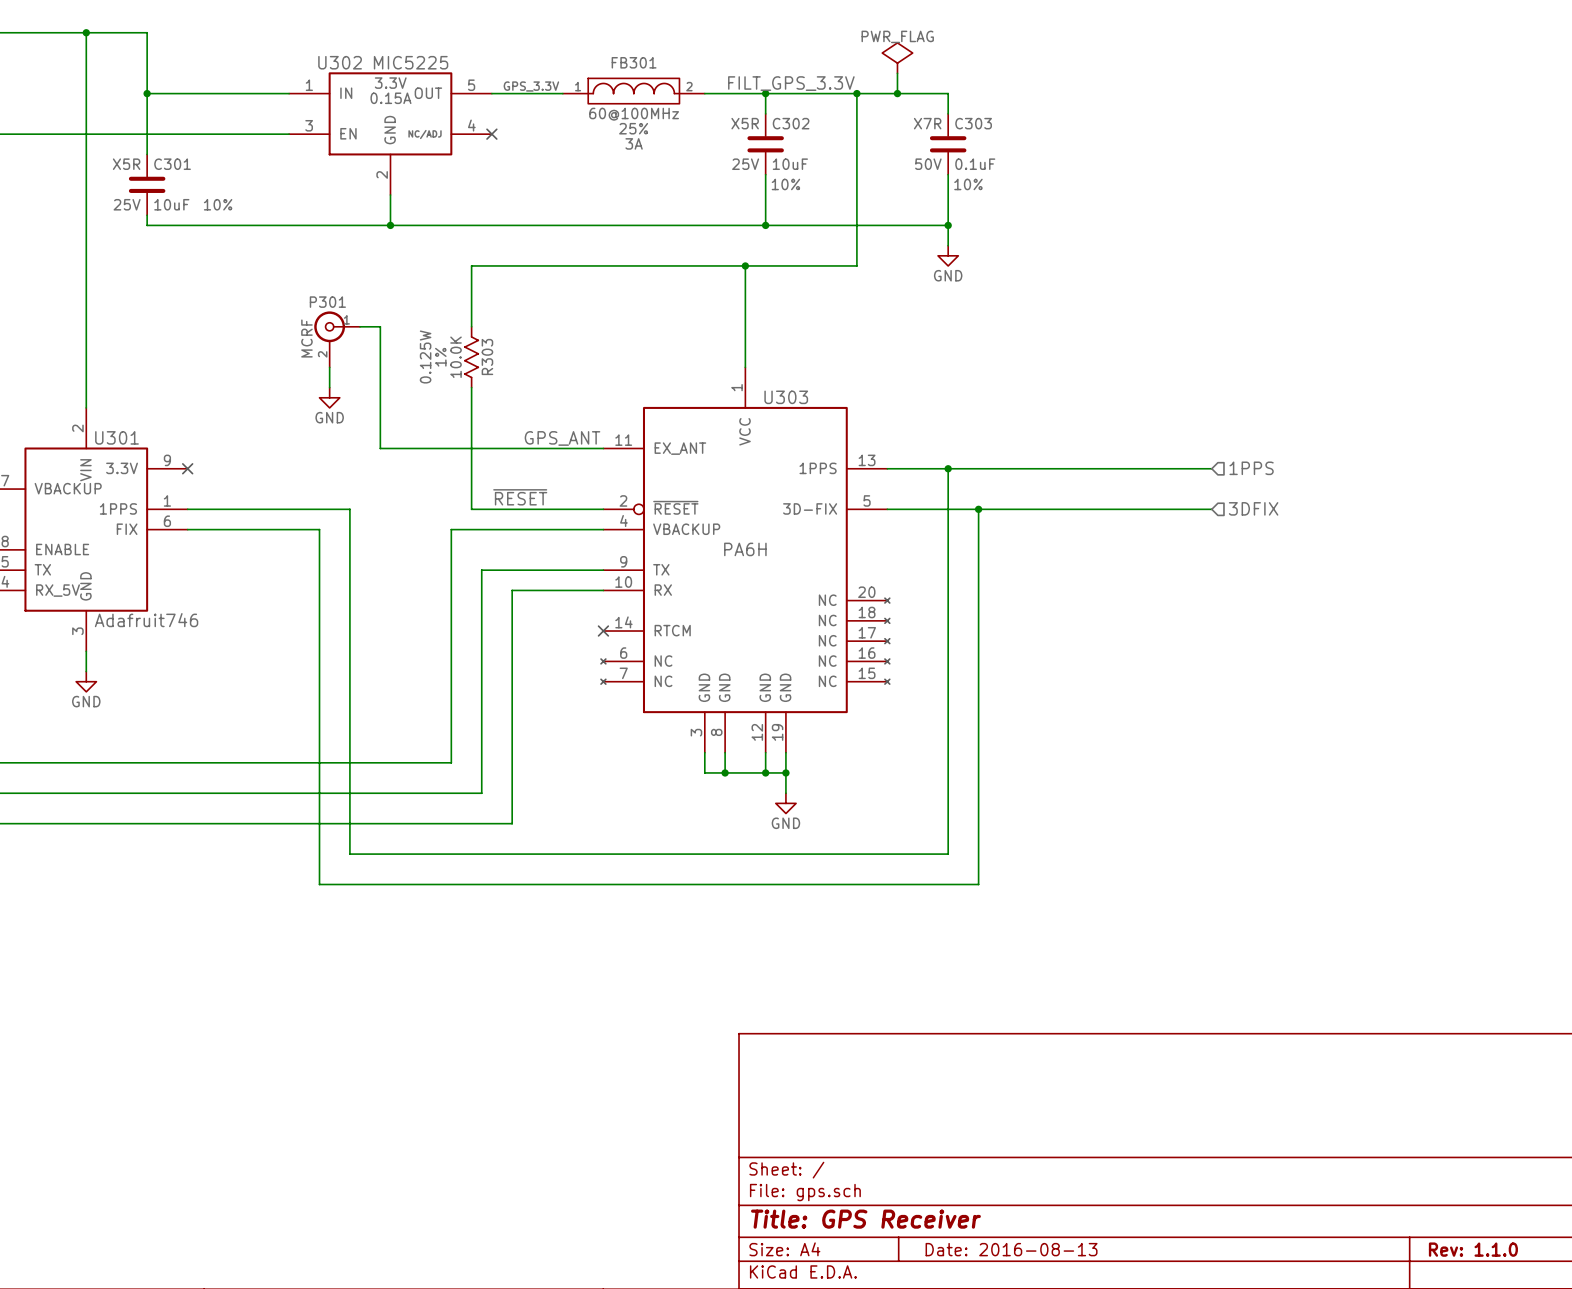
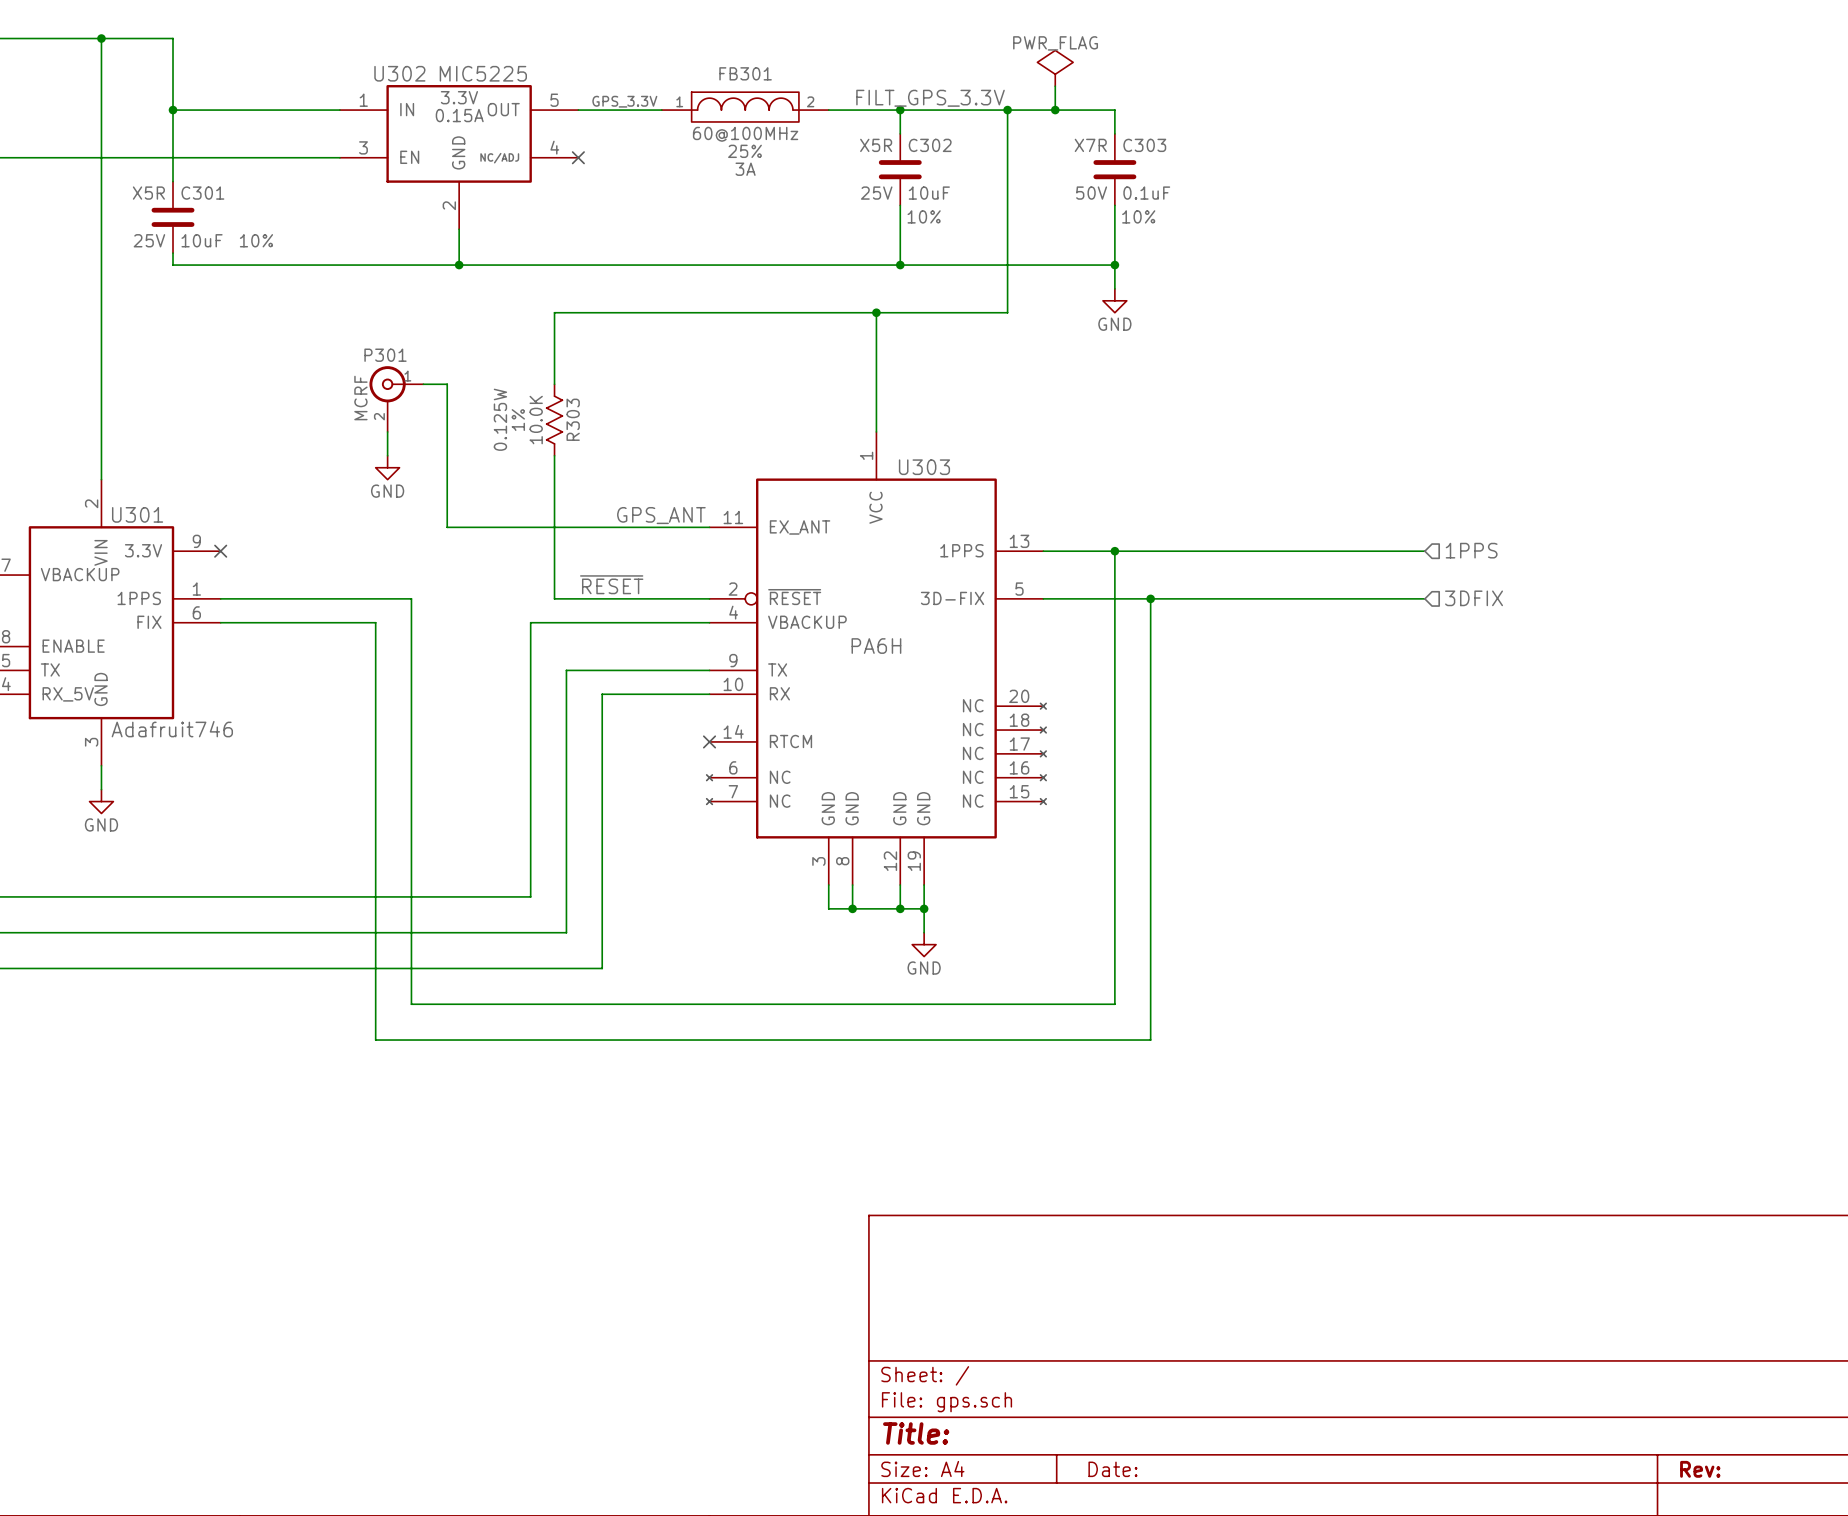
title block: Title: GPS Receiver (865, 1219) -> Title: (916, 1433)
title block: Date: 2016-08-13 (1011, 1249) -> Date: (1112, 1469)
title block: Rev: 1.1.0 (1473, 1249) -> Rev: (1700, 1469)

